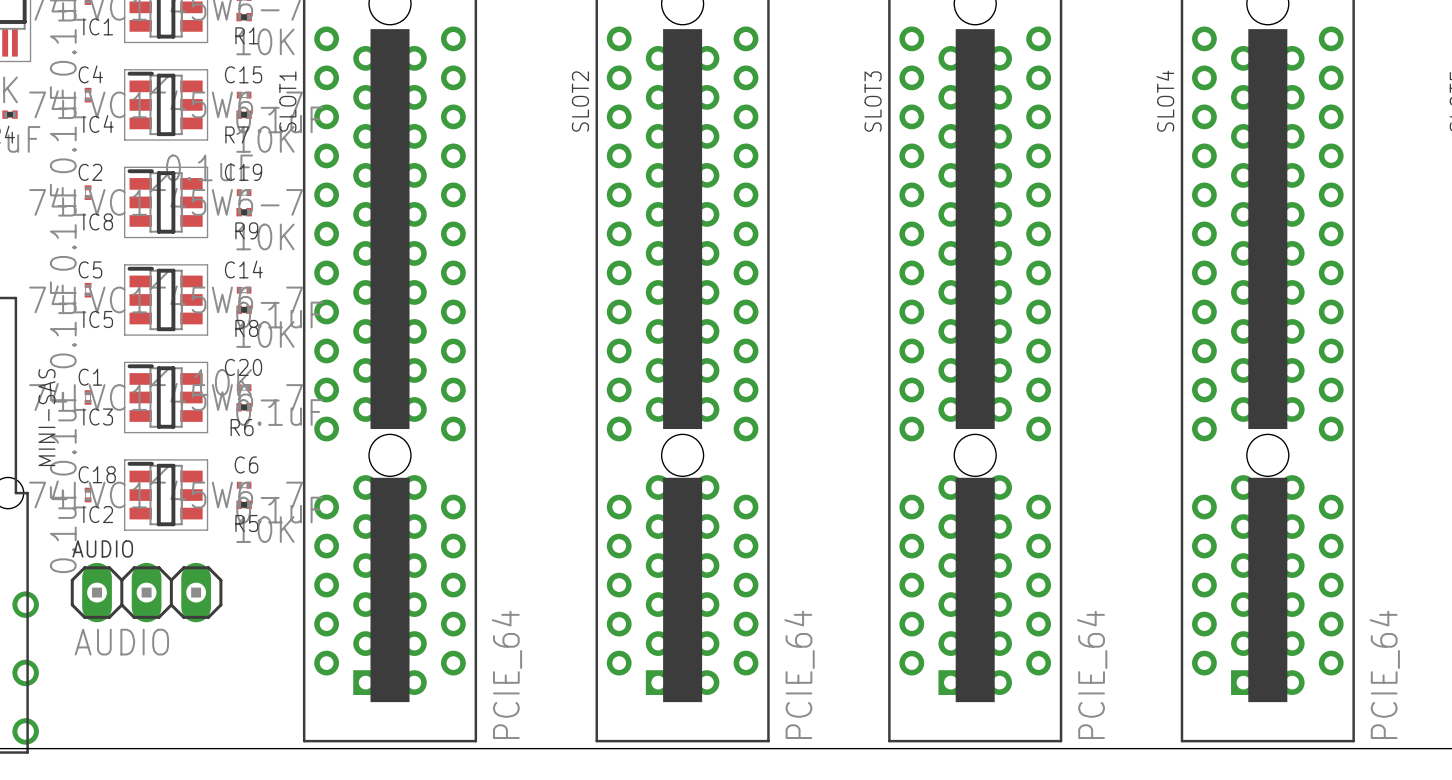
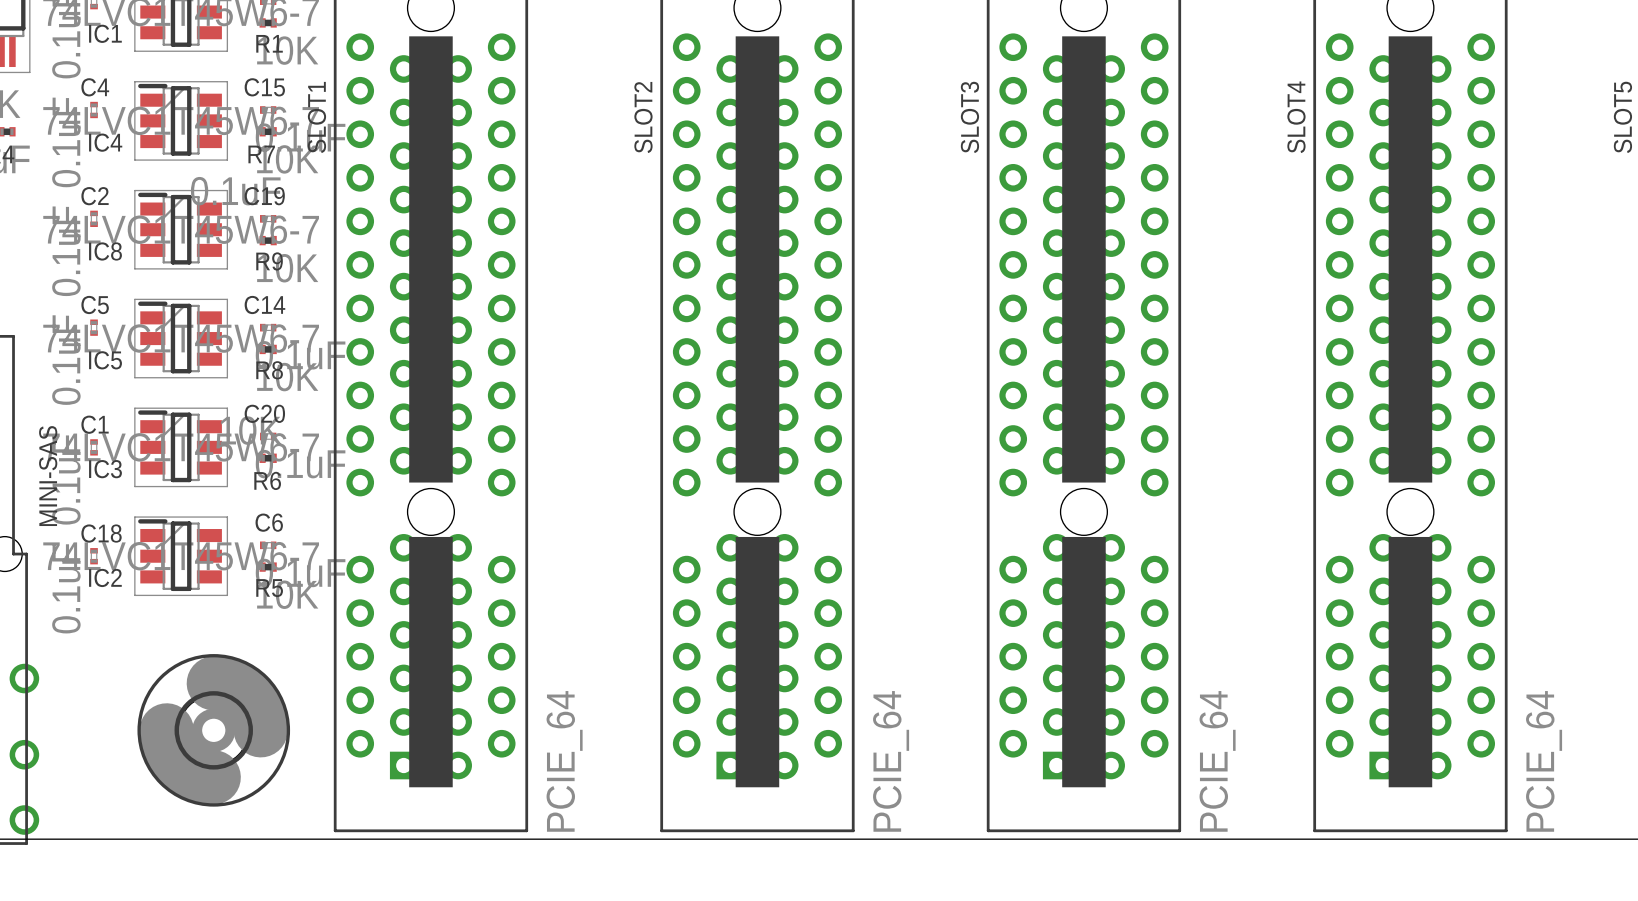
AUDIO: AUDIO (146, 592) -> none
part: none -> (213, 730)

